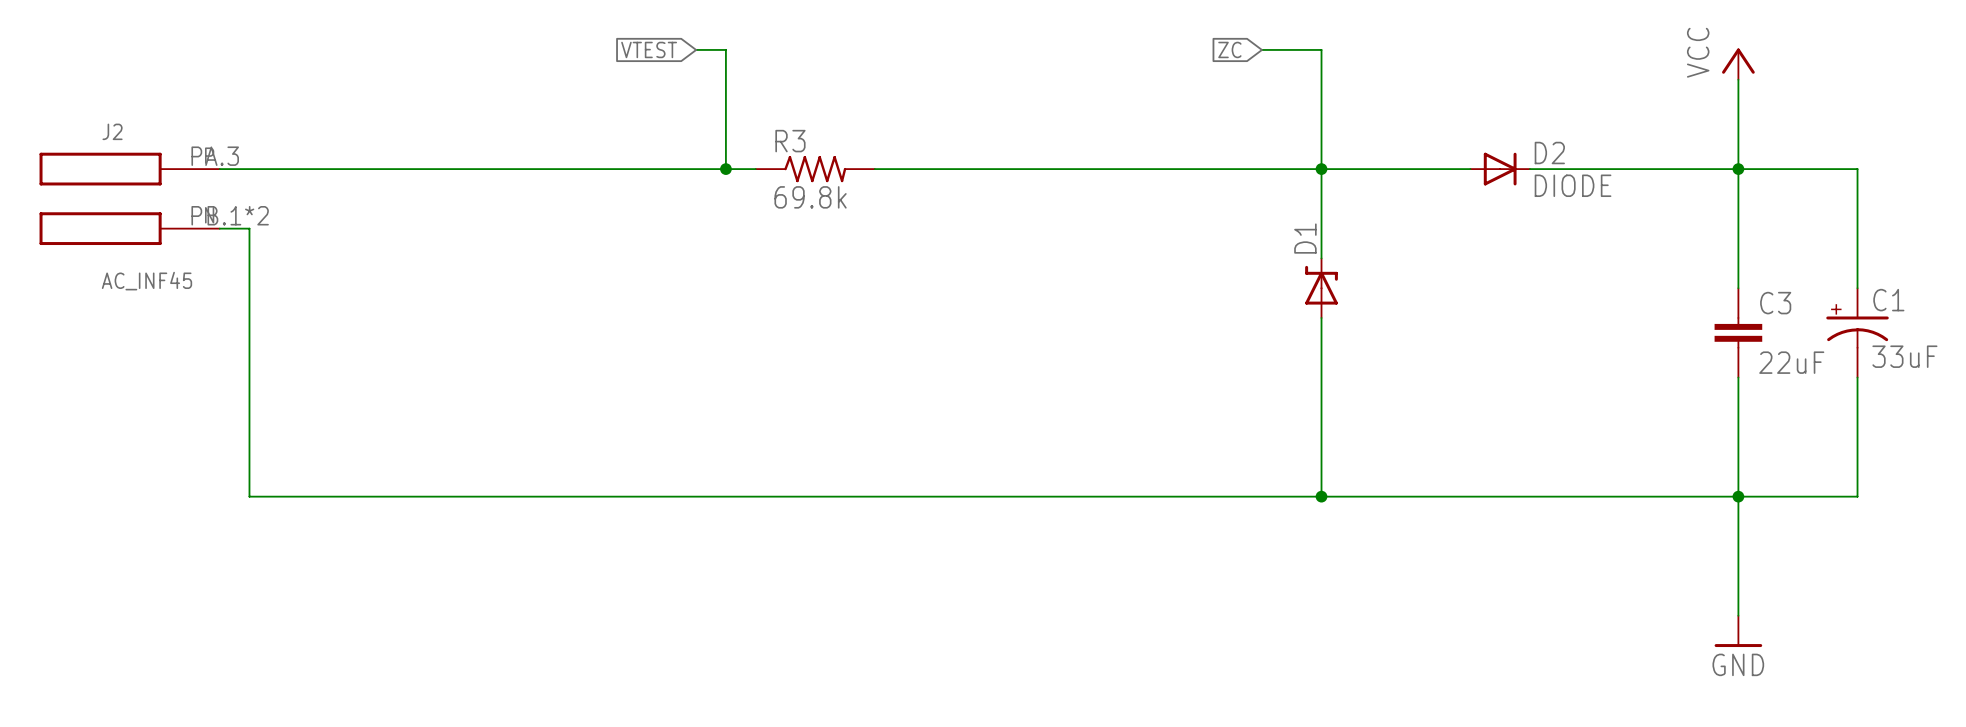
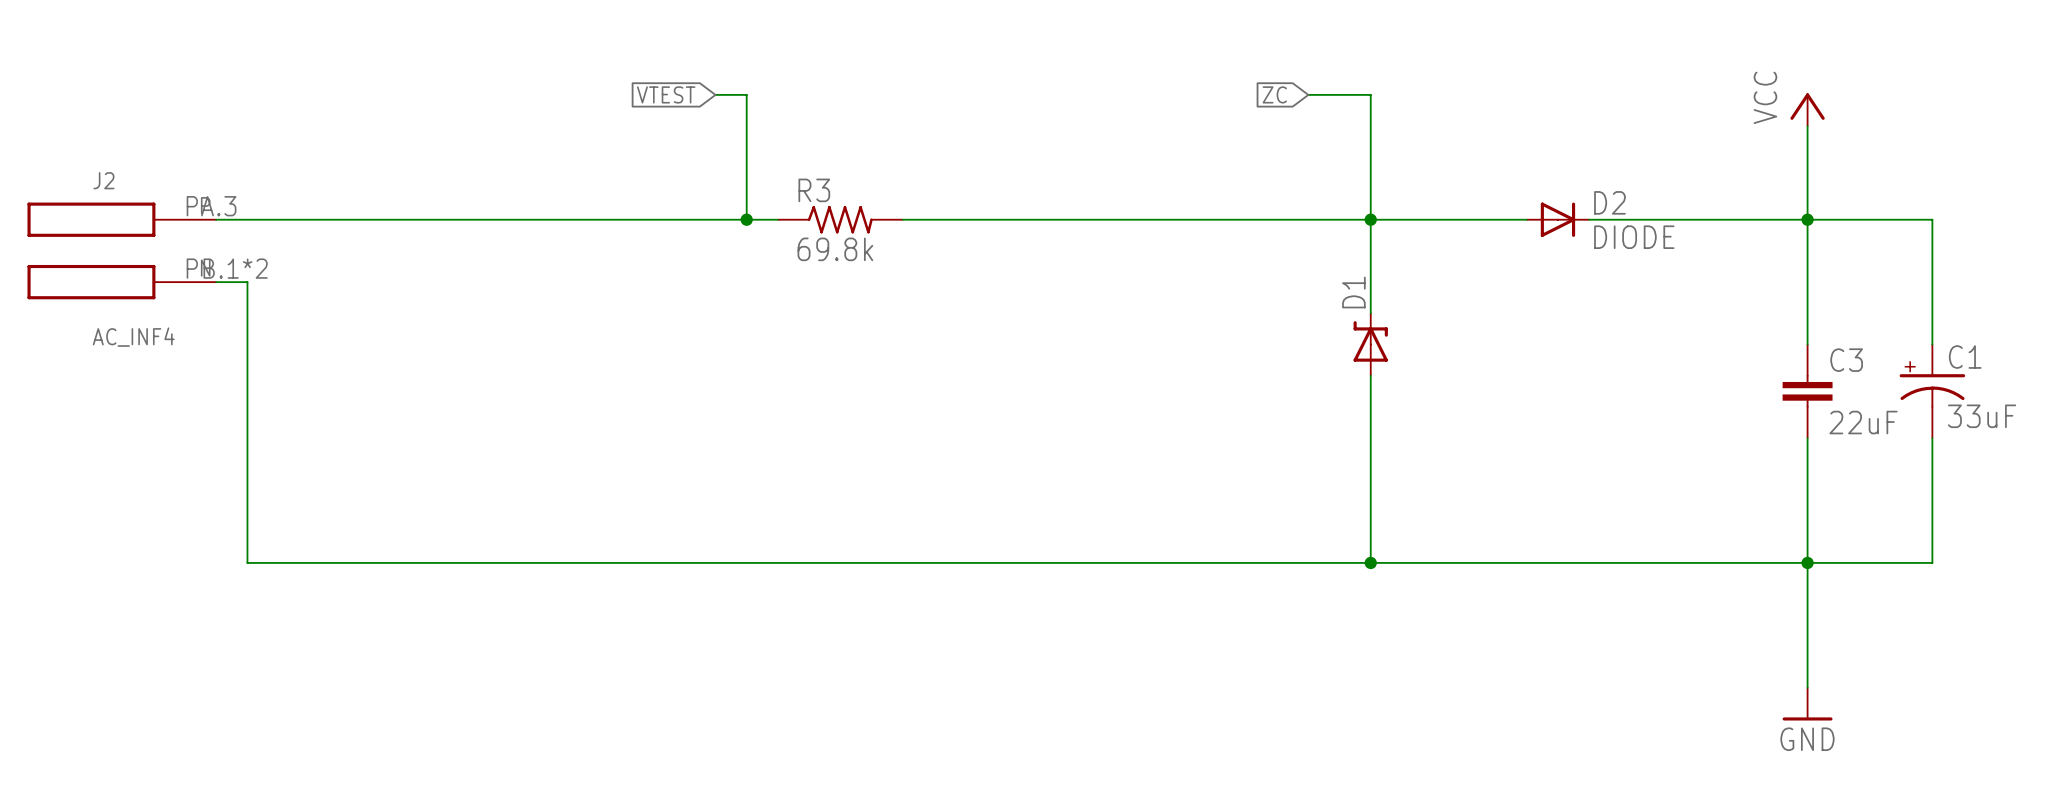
J2 value: AC_INF45 (146, 281) -> AC_INF4 (133, 337)

